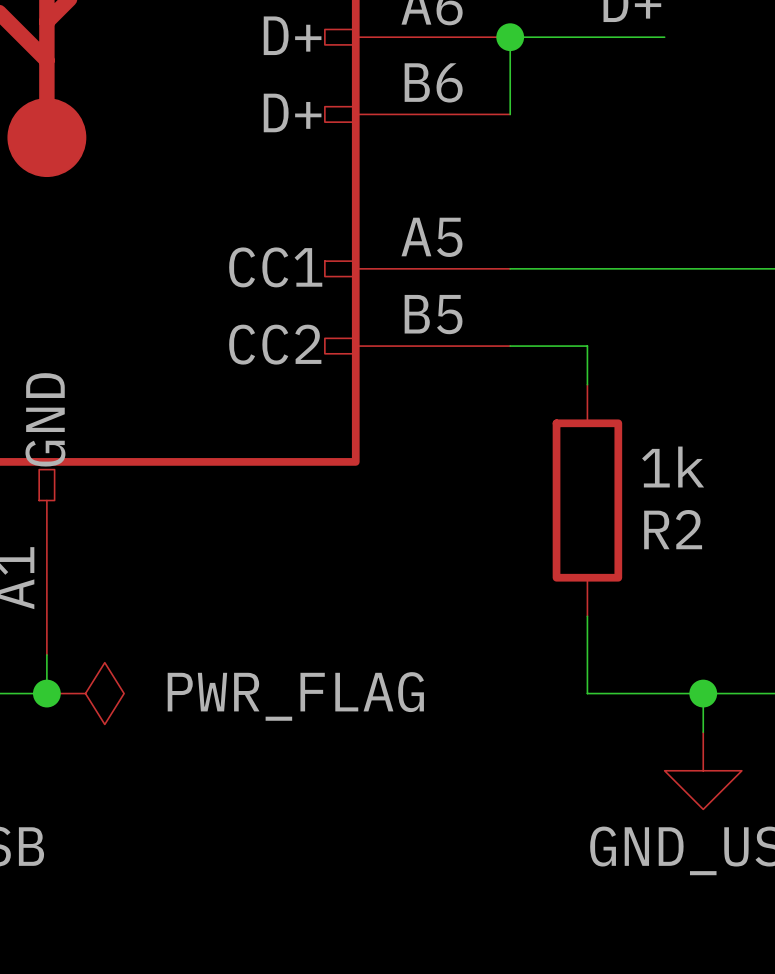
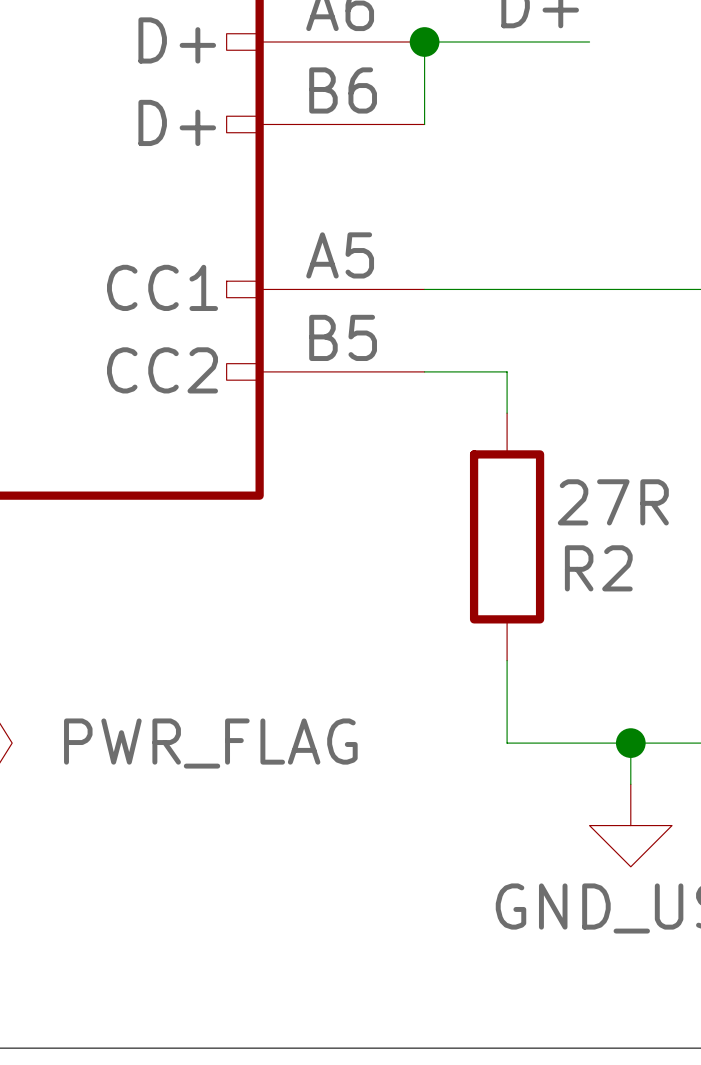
R2 value: 1k (673, 467) -> 27R (613, 502)

